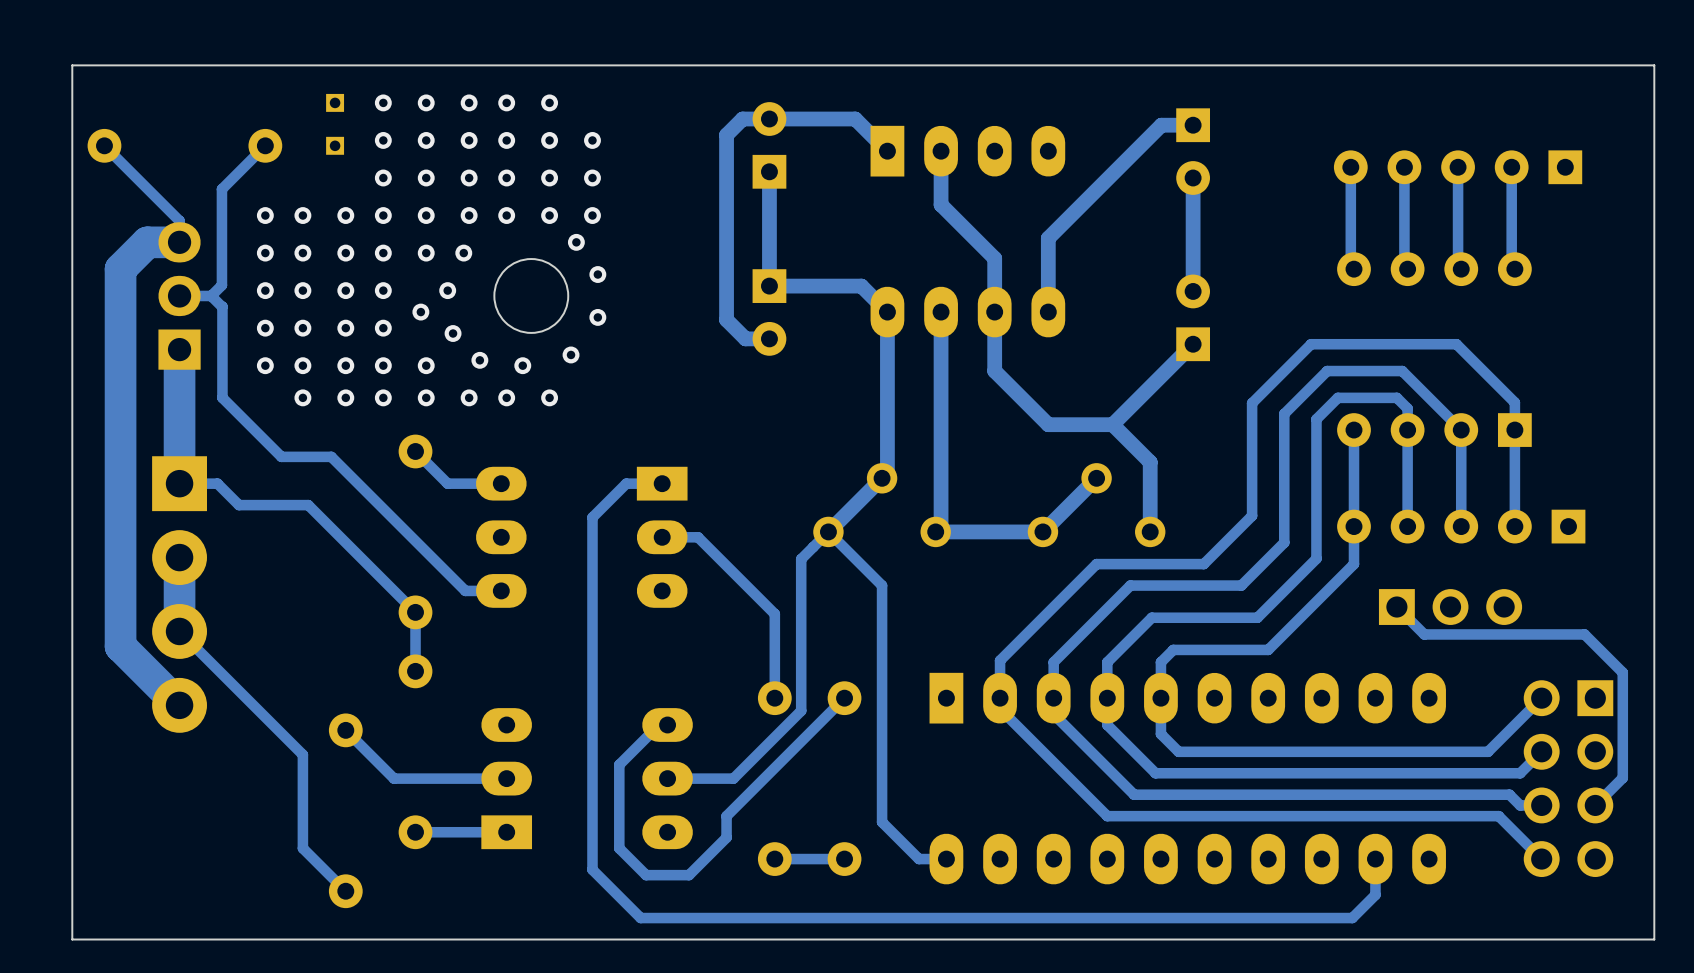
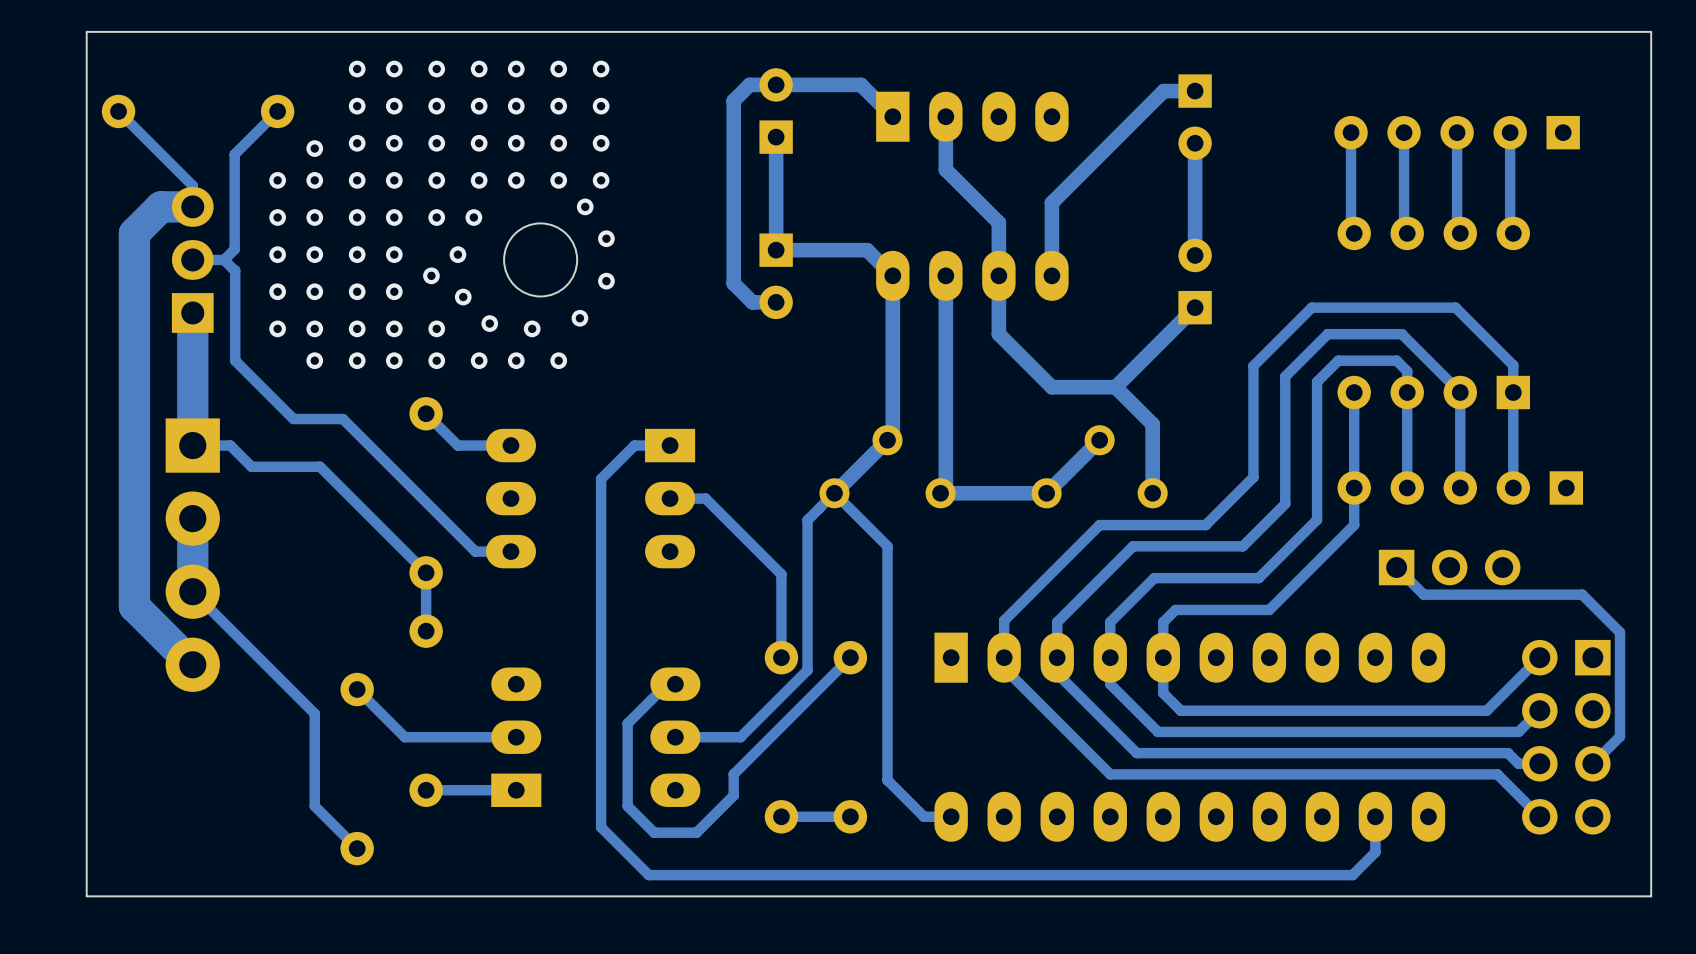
part: (335, 102) -> none
via: none -> (357, 69)
via: none -> (601, 69)
via: none -> (357, 106)
part: (335, 145) -> none
via: none -> (357, 143)
via: none -> (314, 148)

